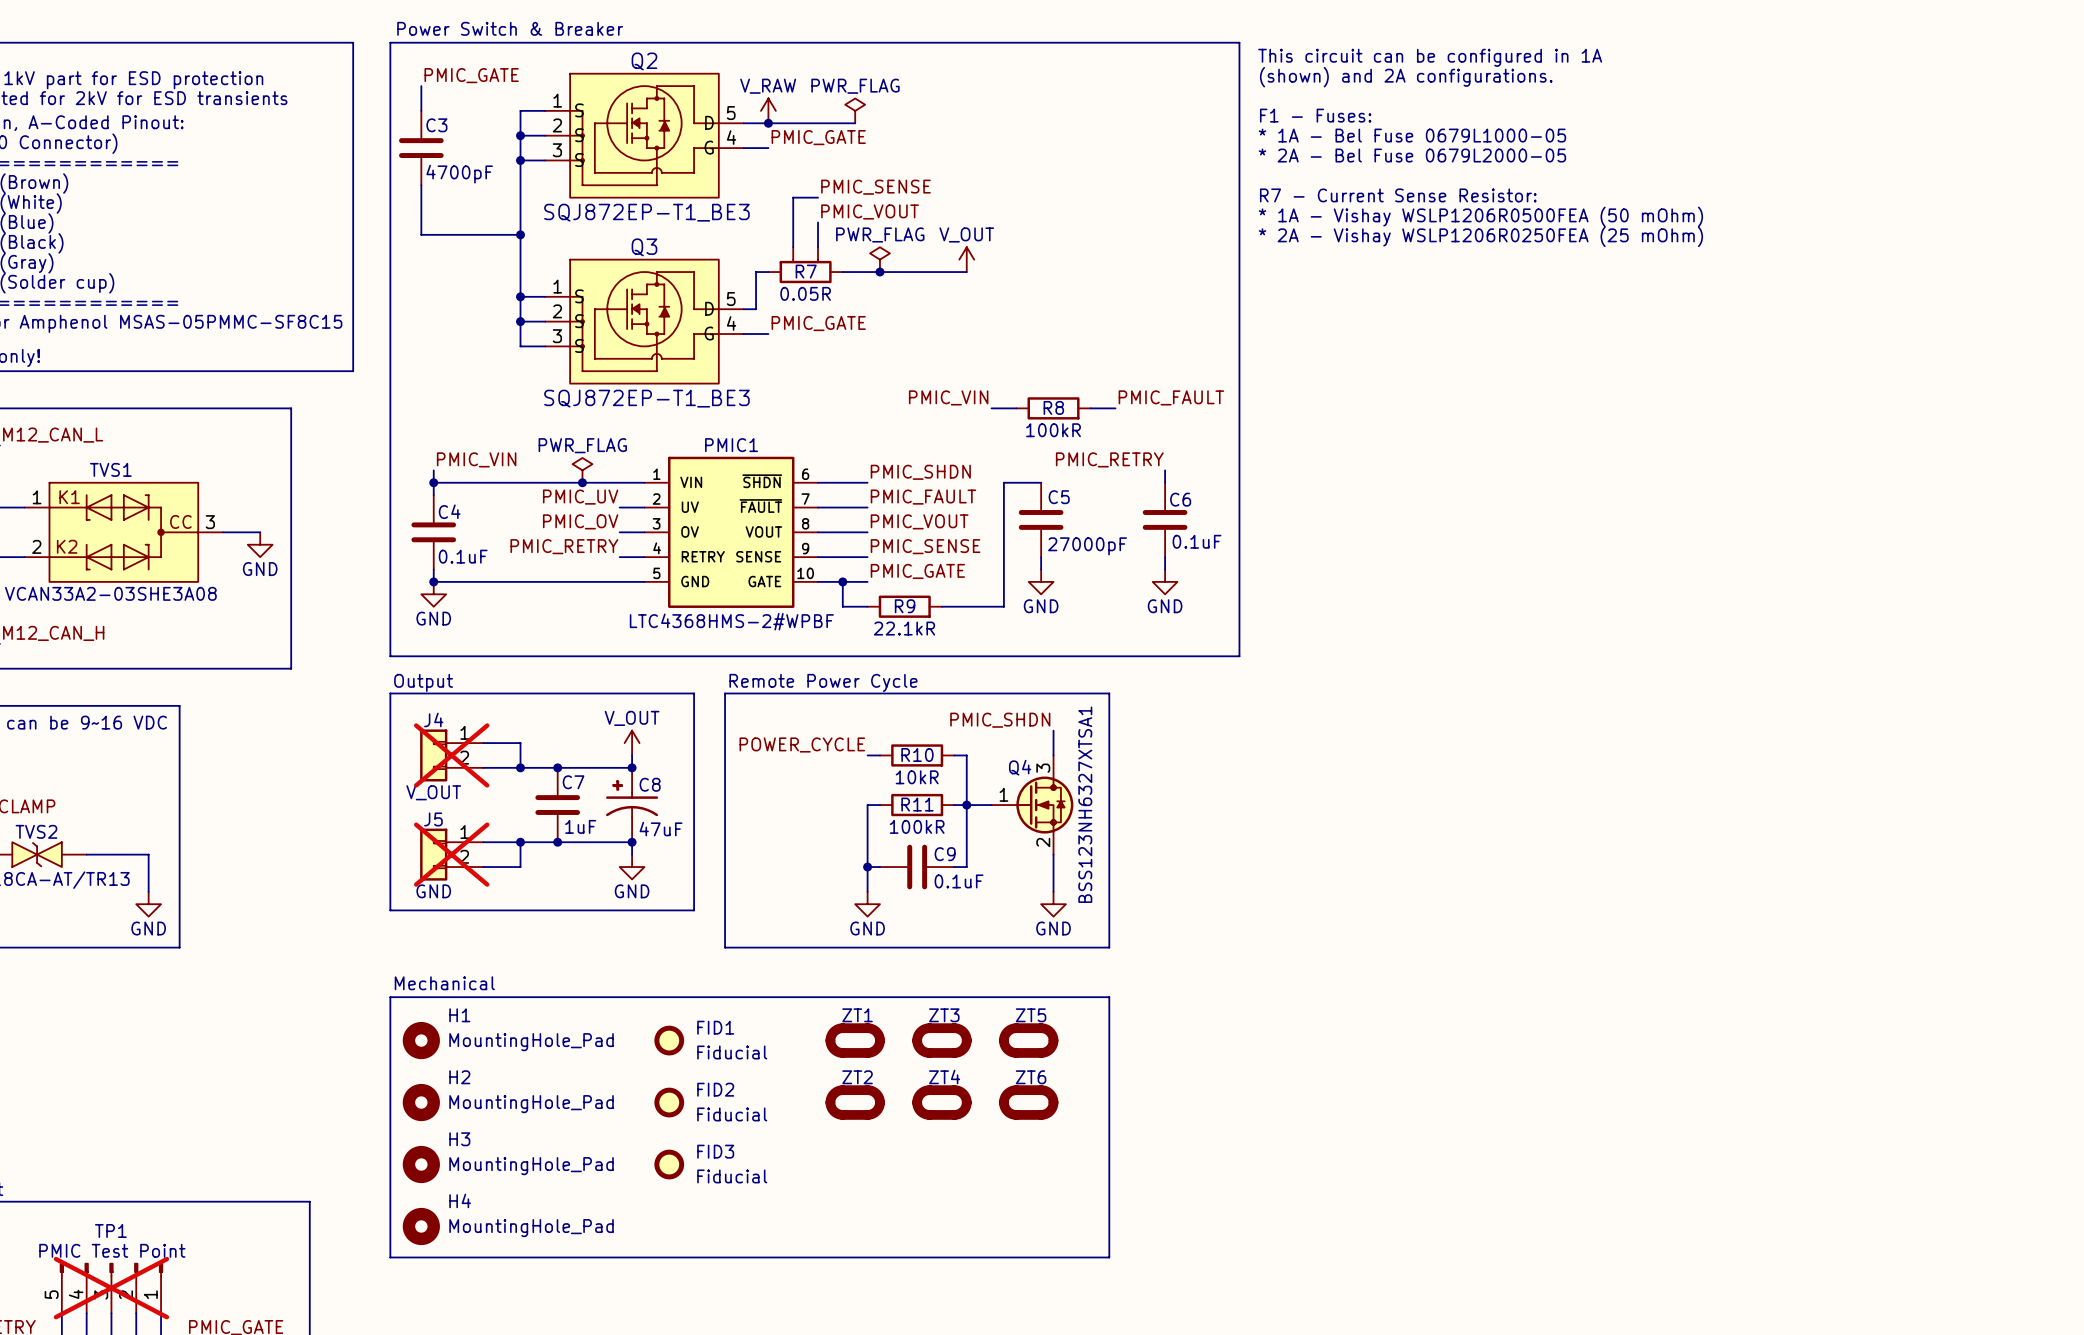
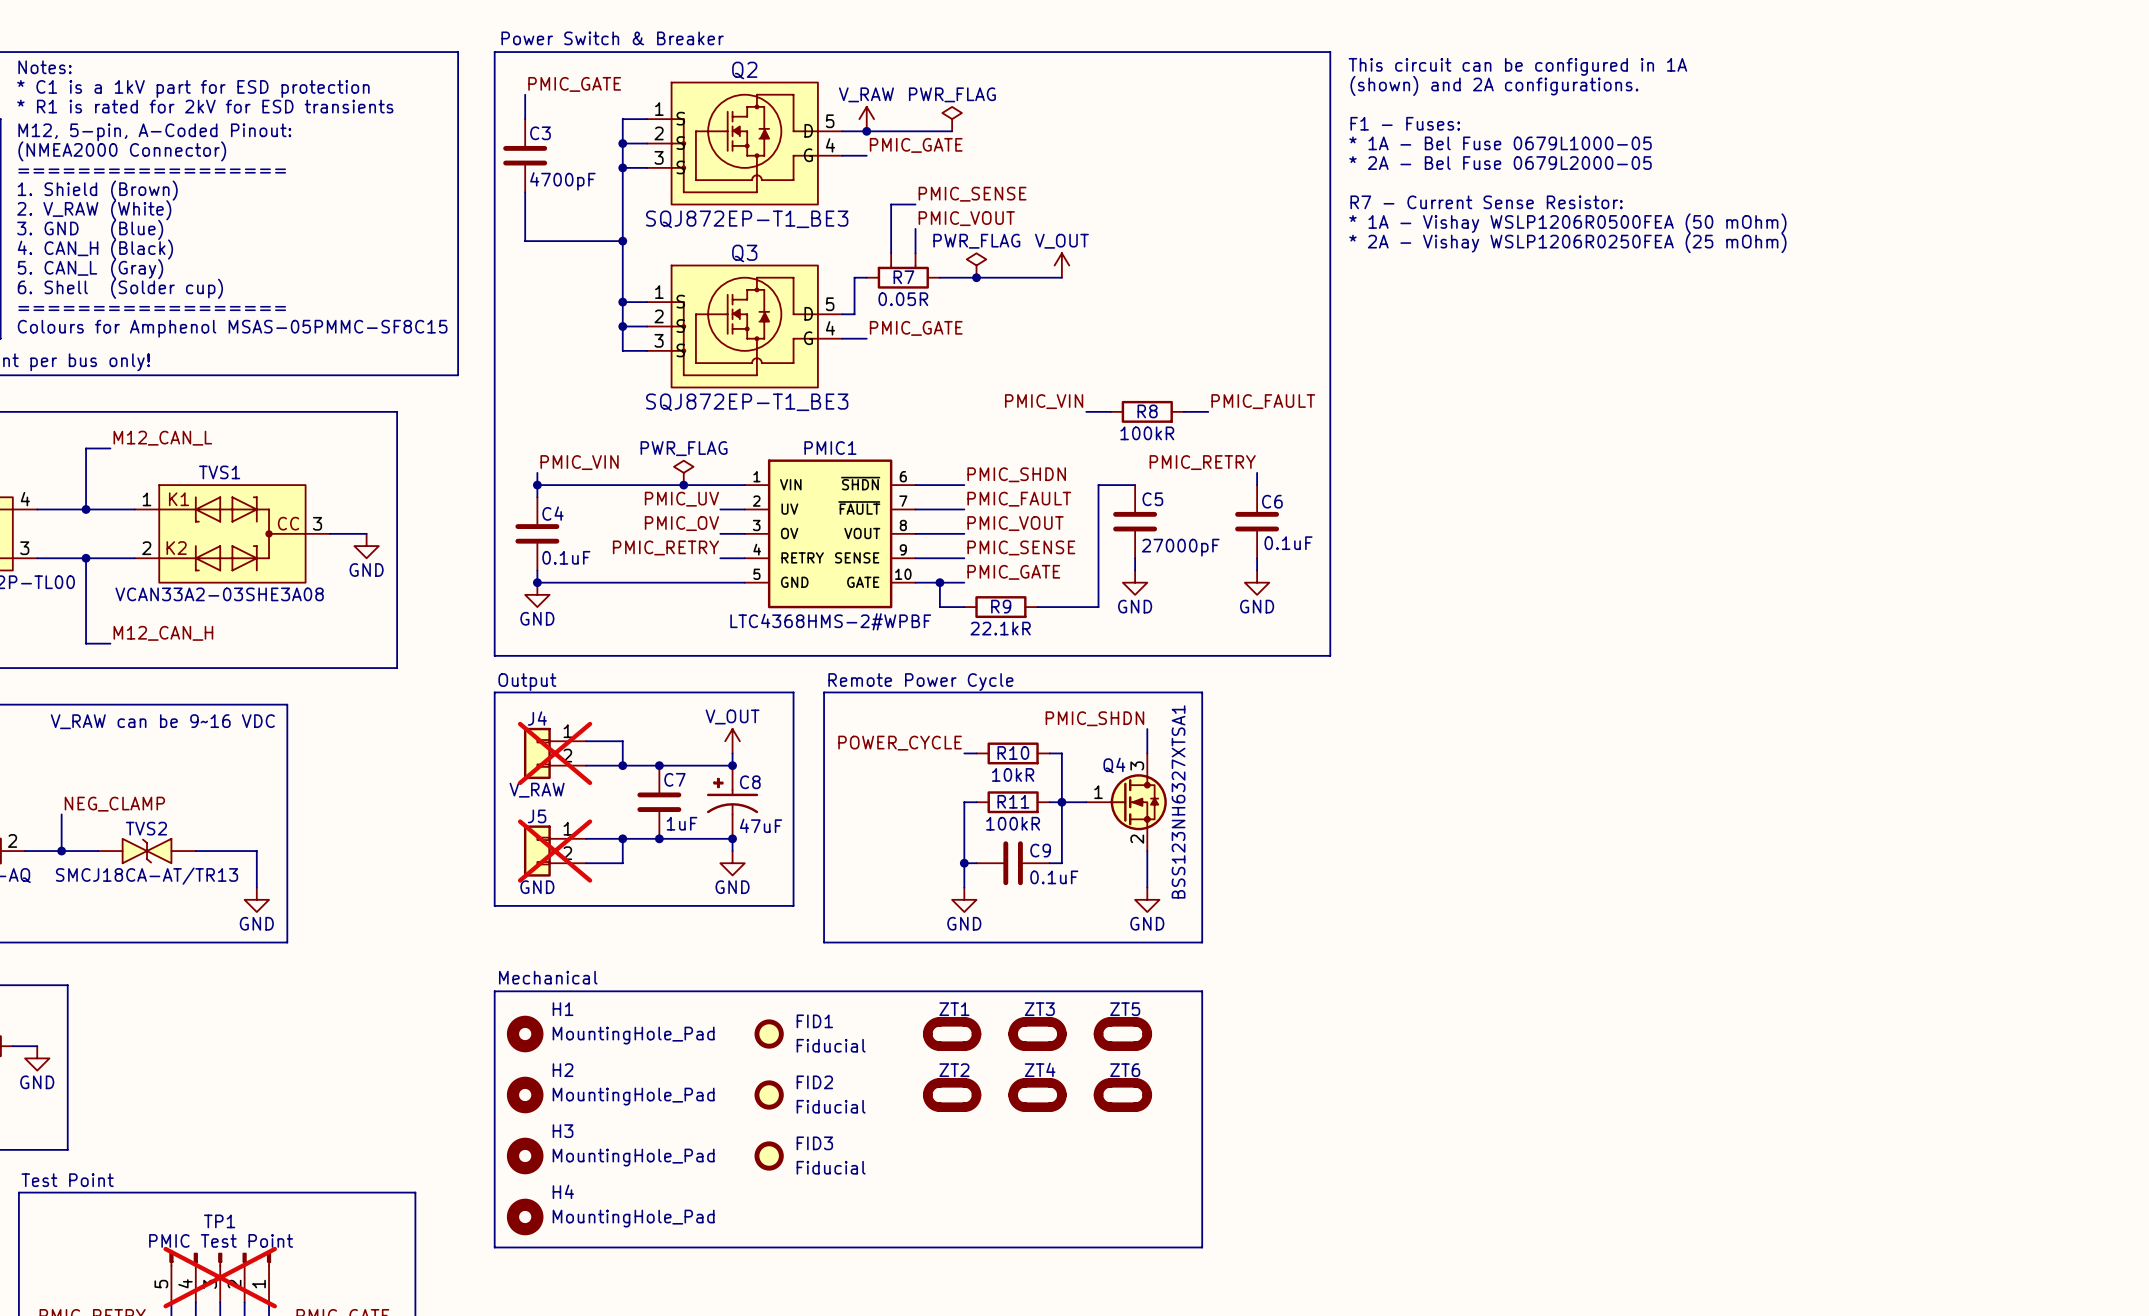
J4 value: V_OUT (433, 792) -> V_RAW (537, 790)

